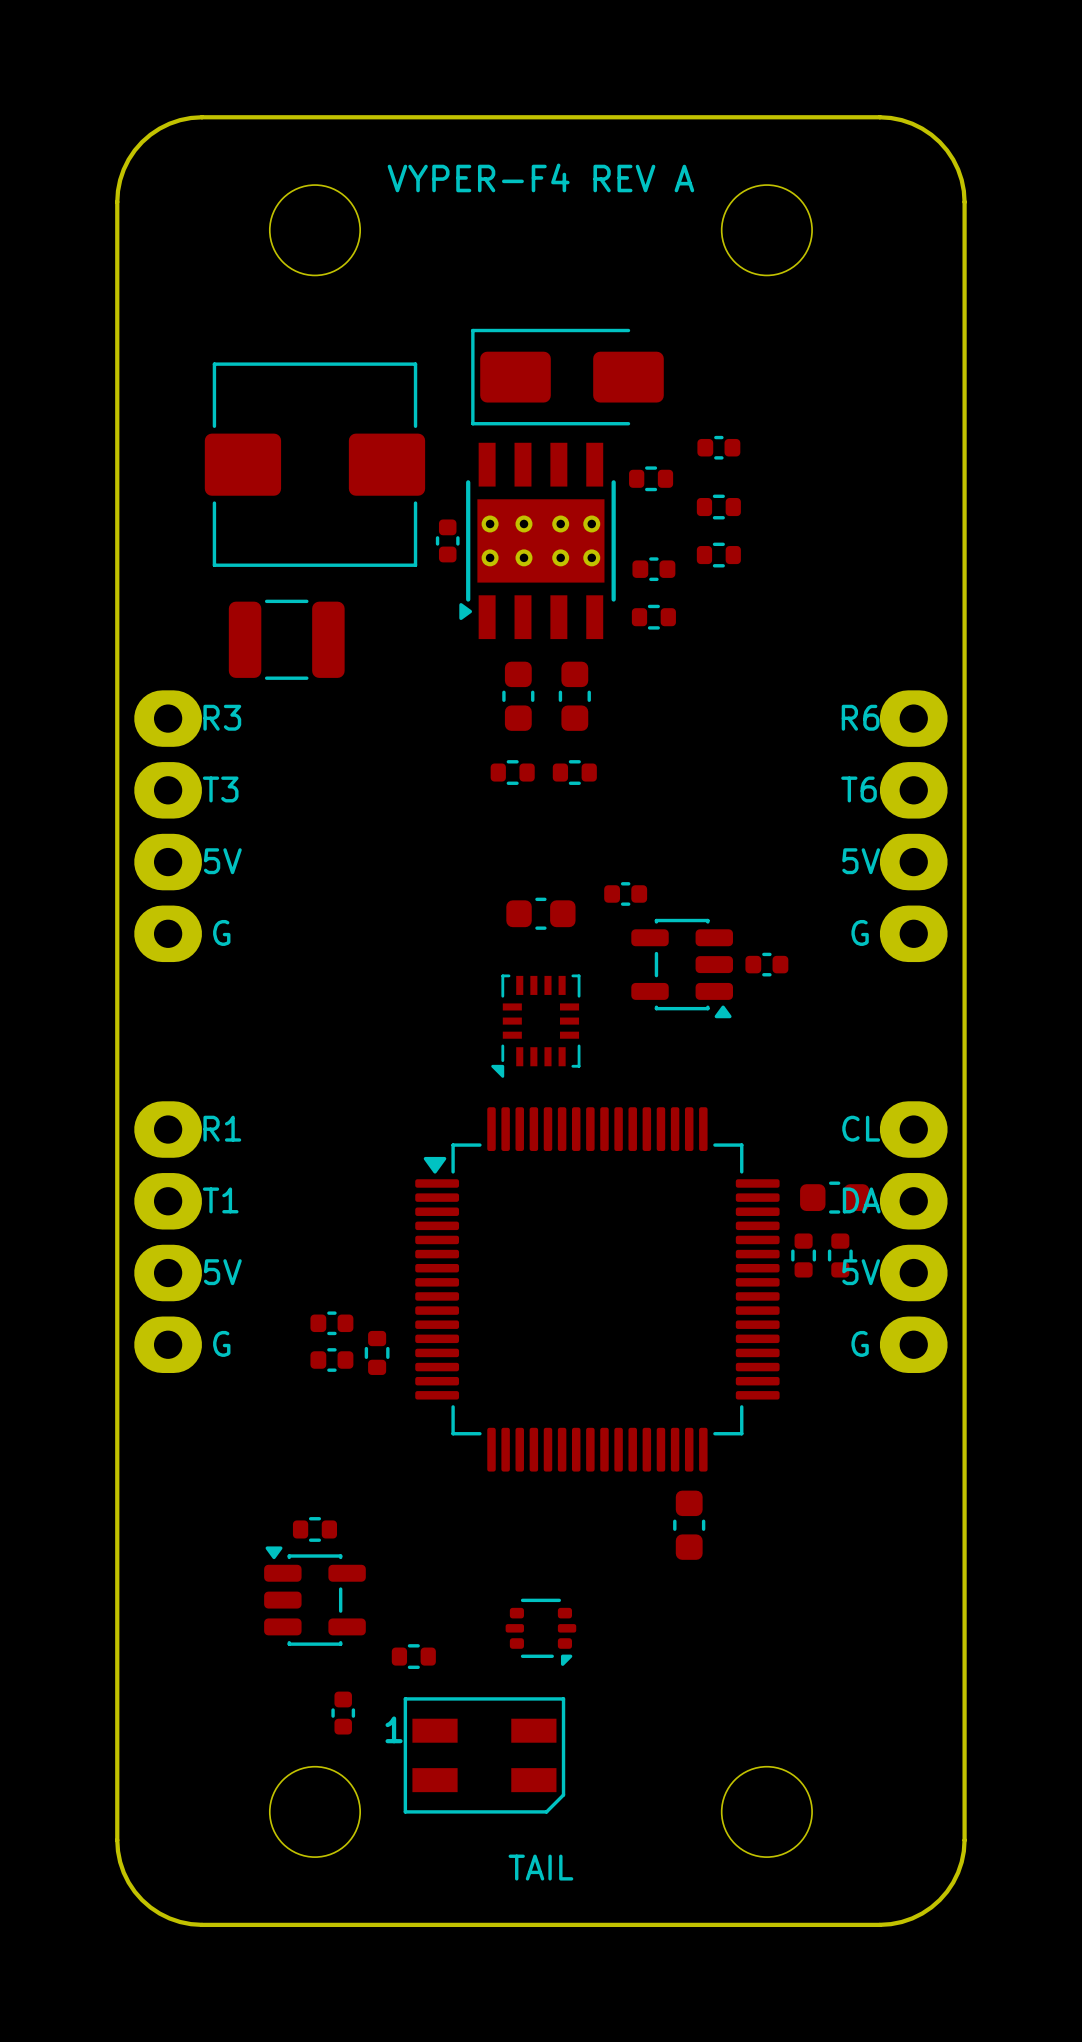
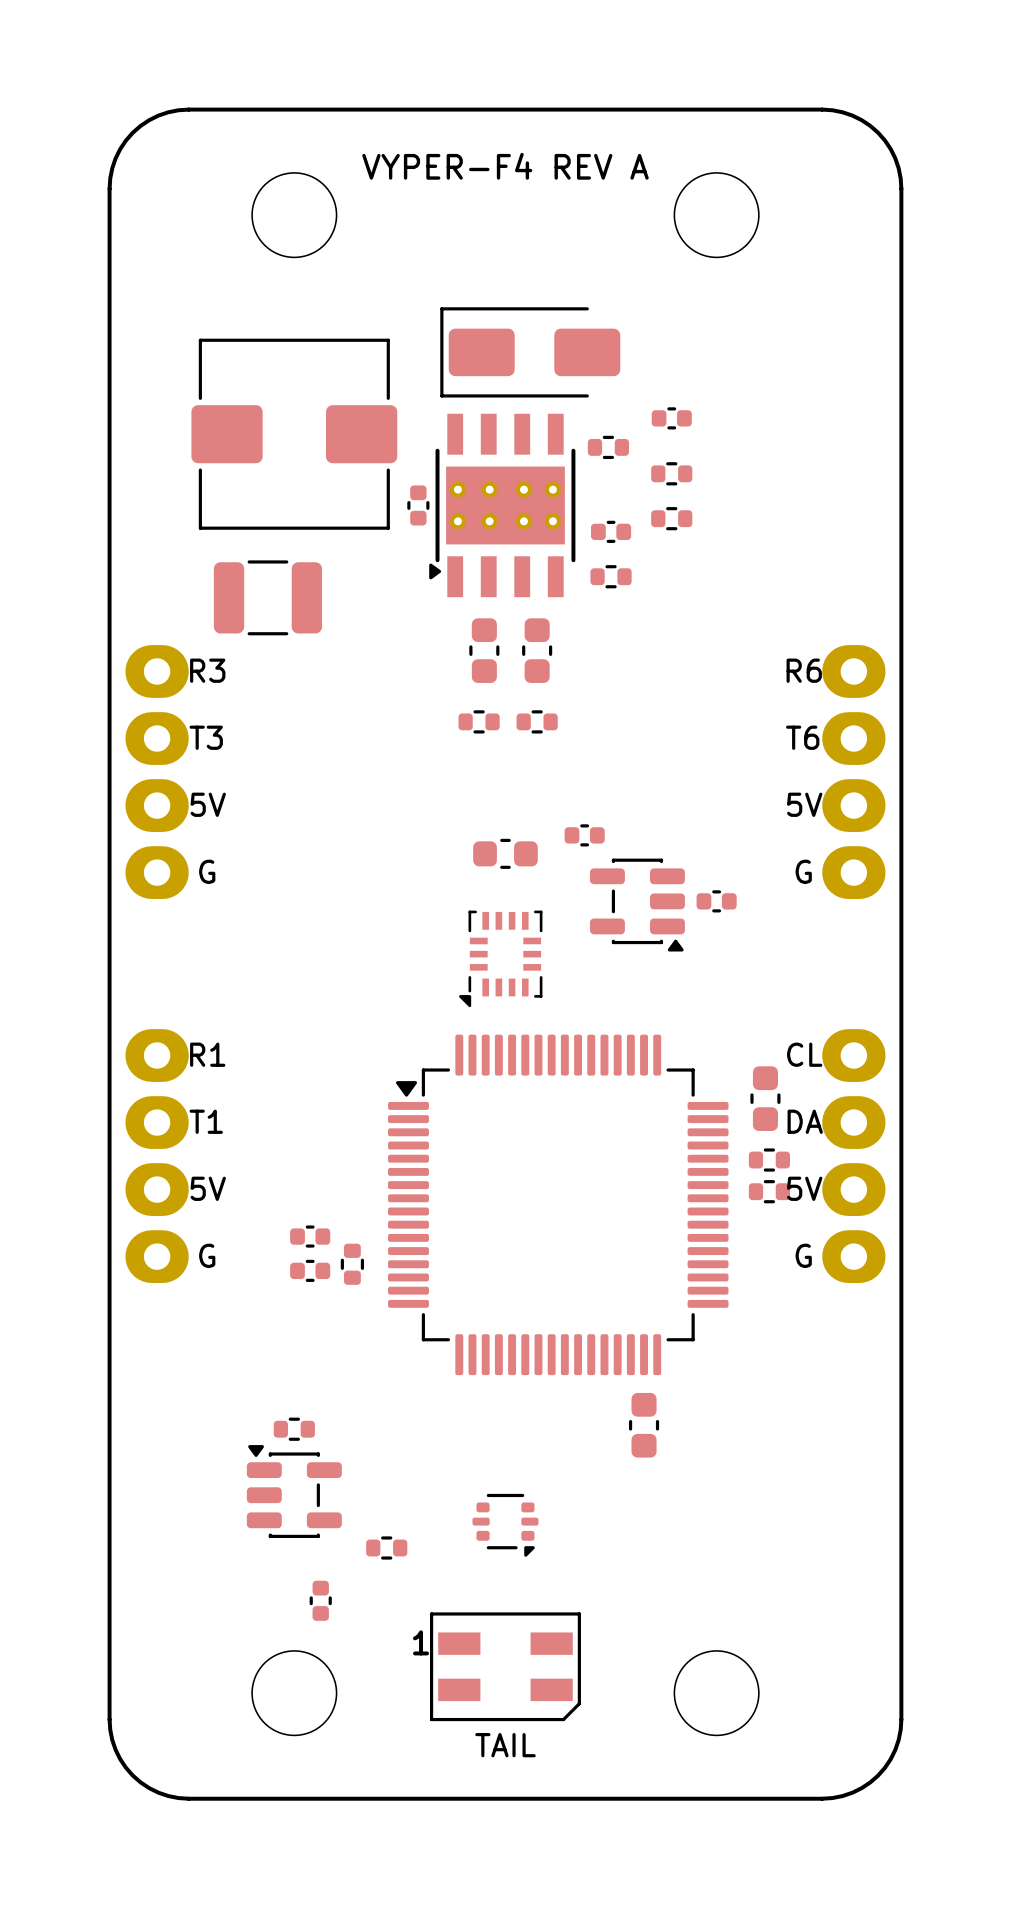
part rotation: 0° (834, 1197) -> 90° clockwise (765, 1098)
part: none -> (769, 1160)
part: (803, 1255) -> none
part: (840, 1255) -> none
part: none -> (769, 1191)
part position: (484, 1755) -> (505, 1666)

